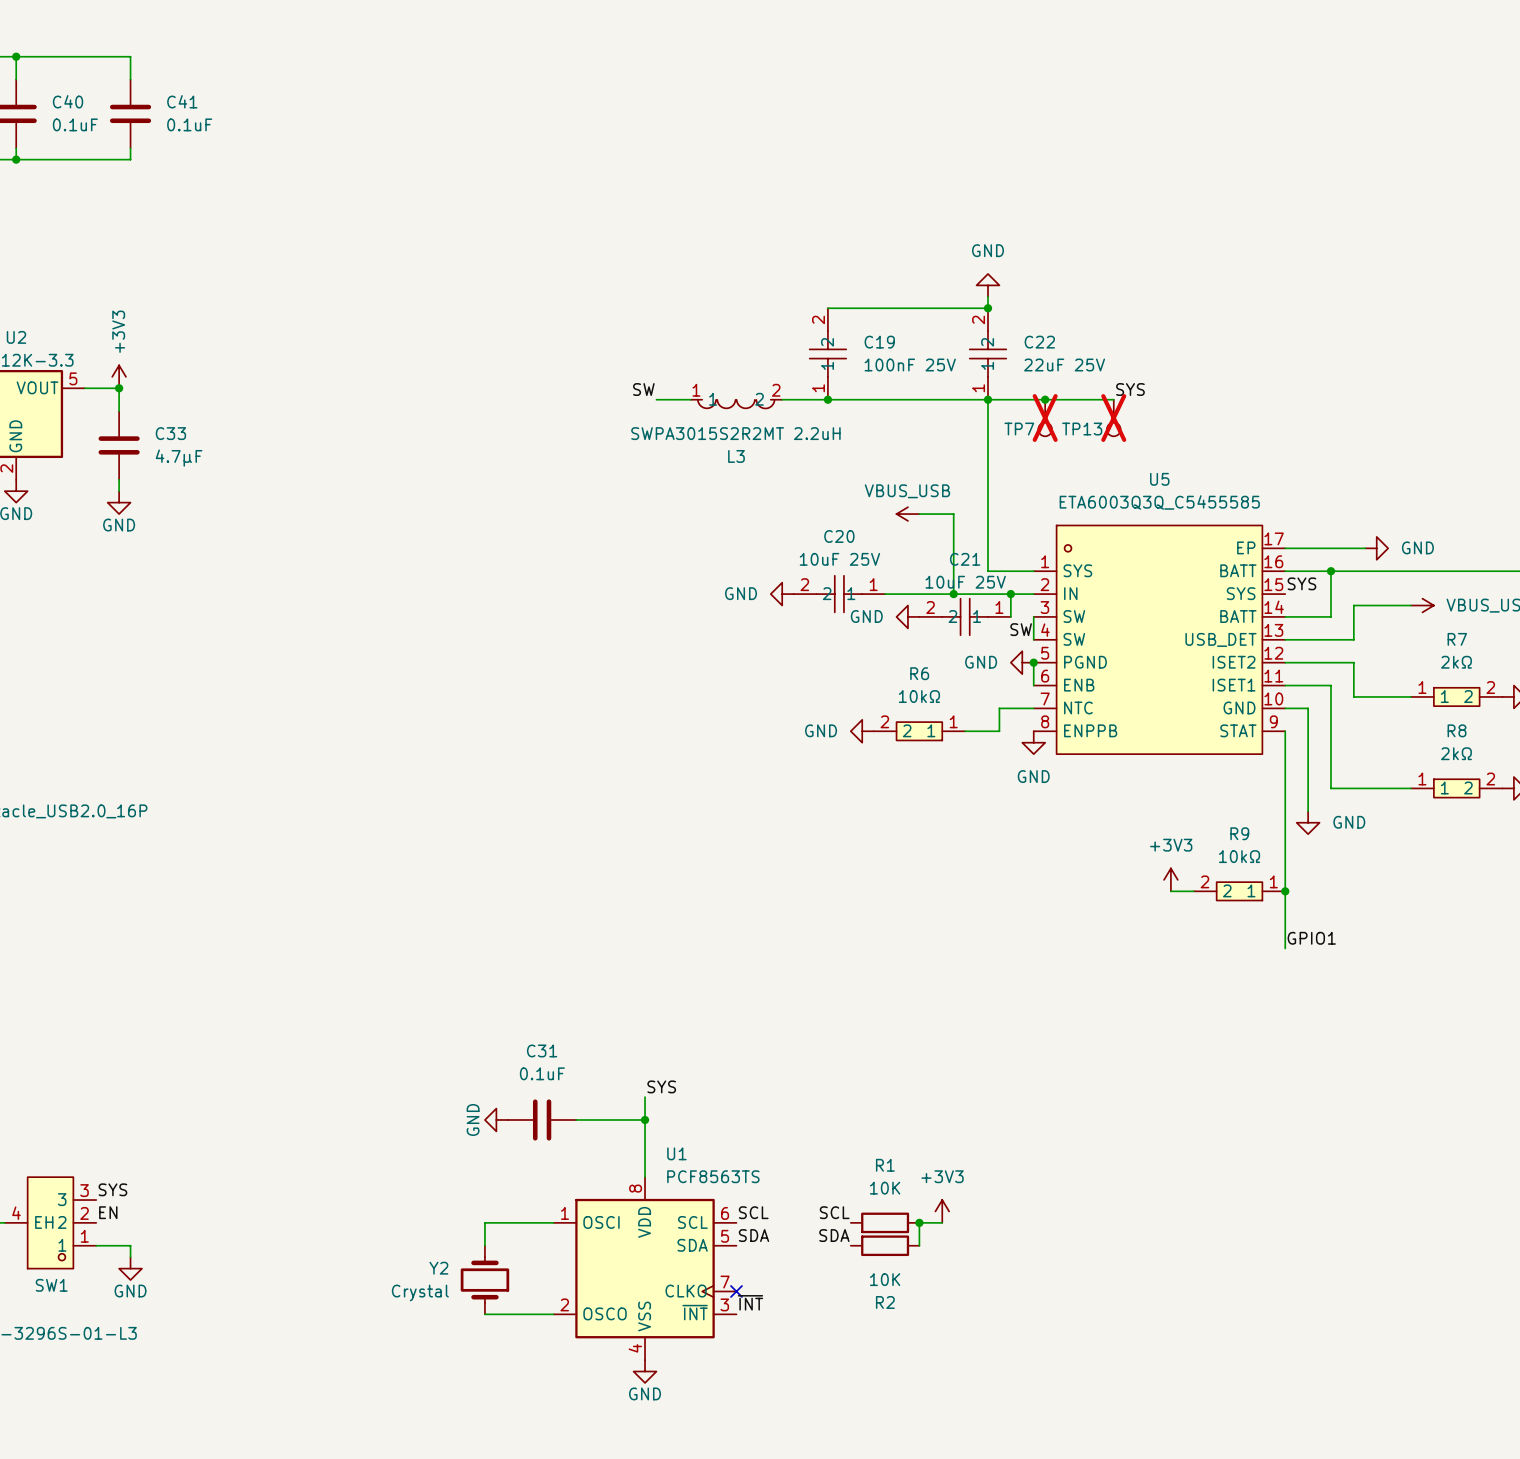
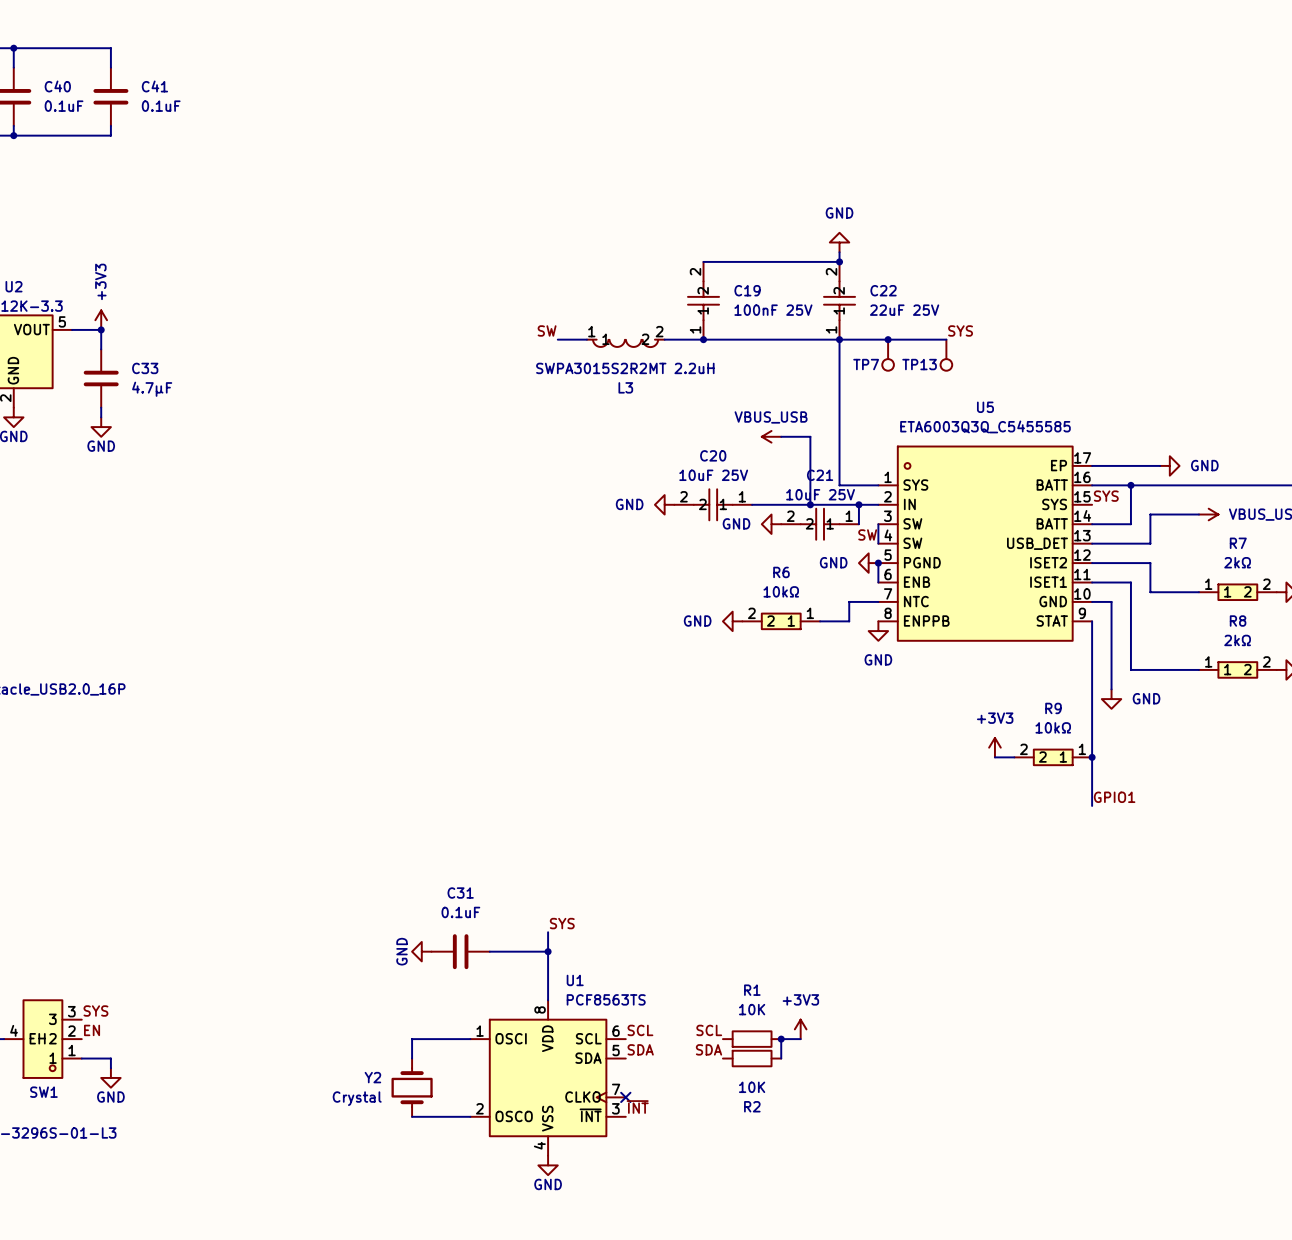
TP7 do-not-place cross: (1045, 418) -> none
TP13 do-not-place cross: (1113, 418) -> none

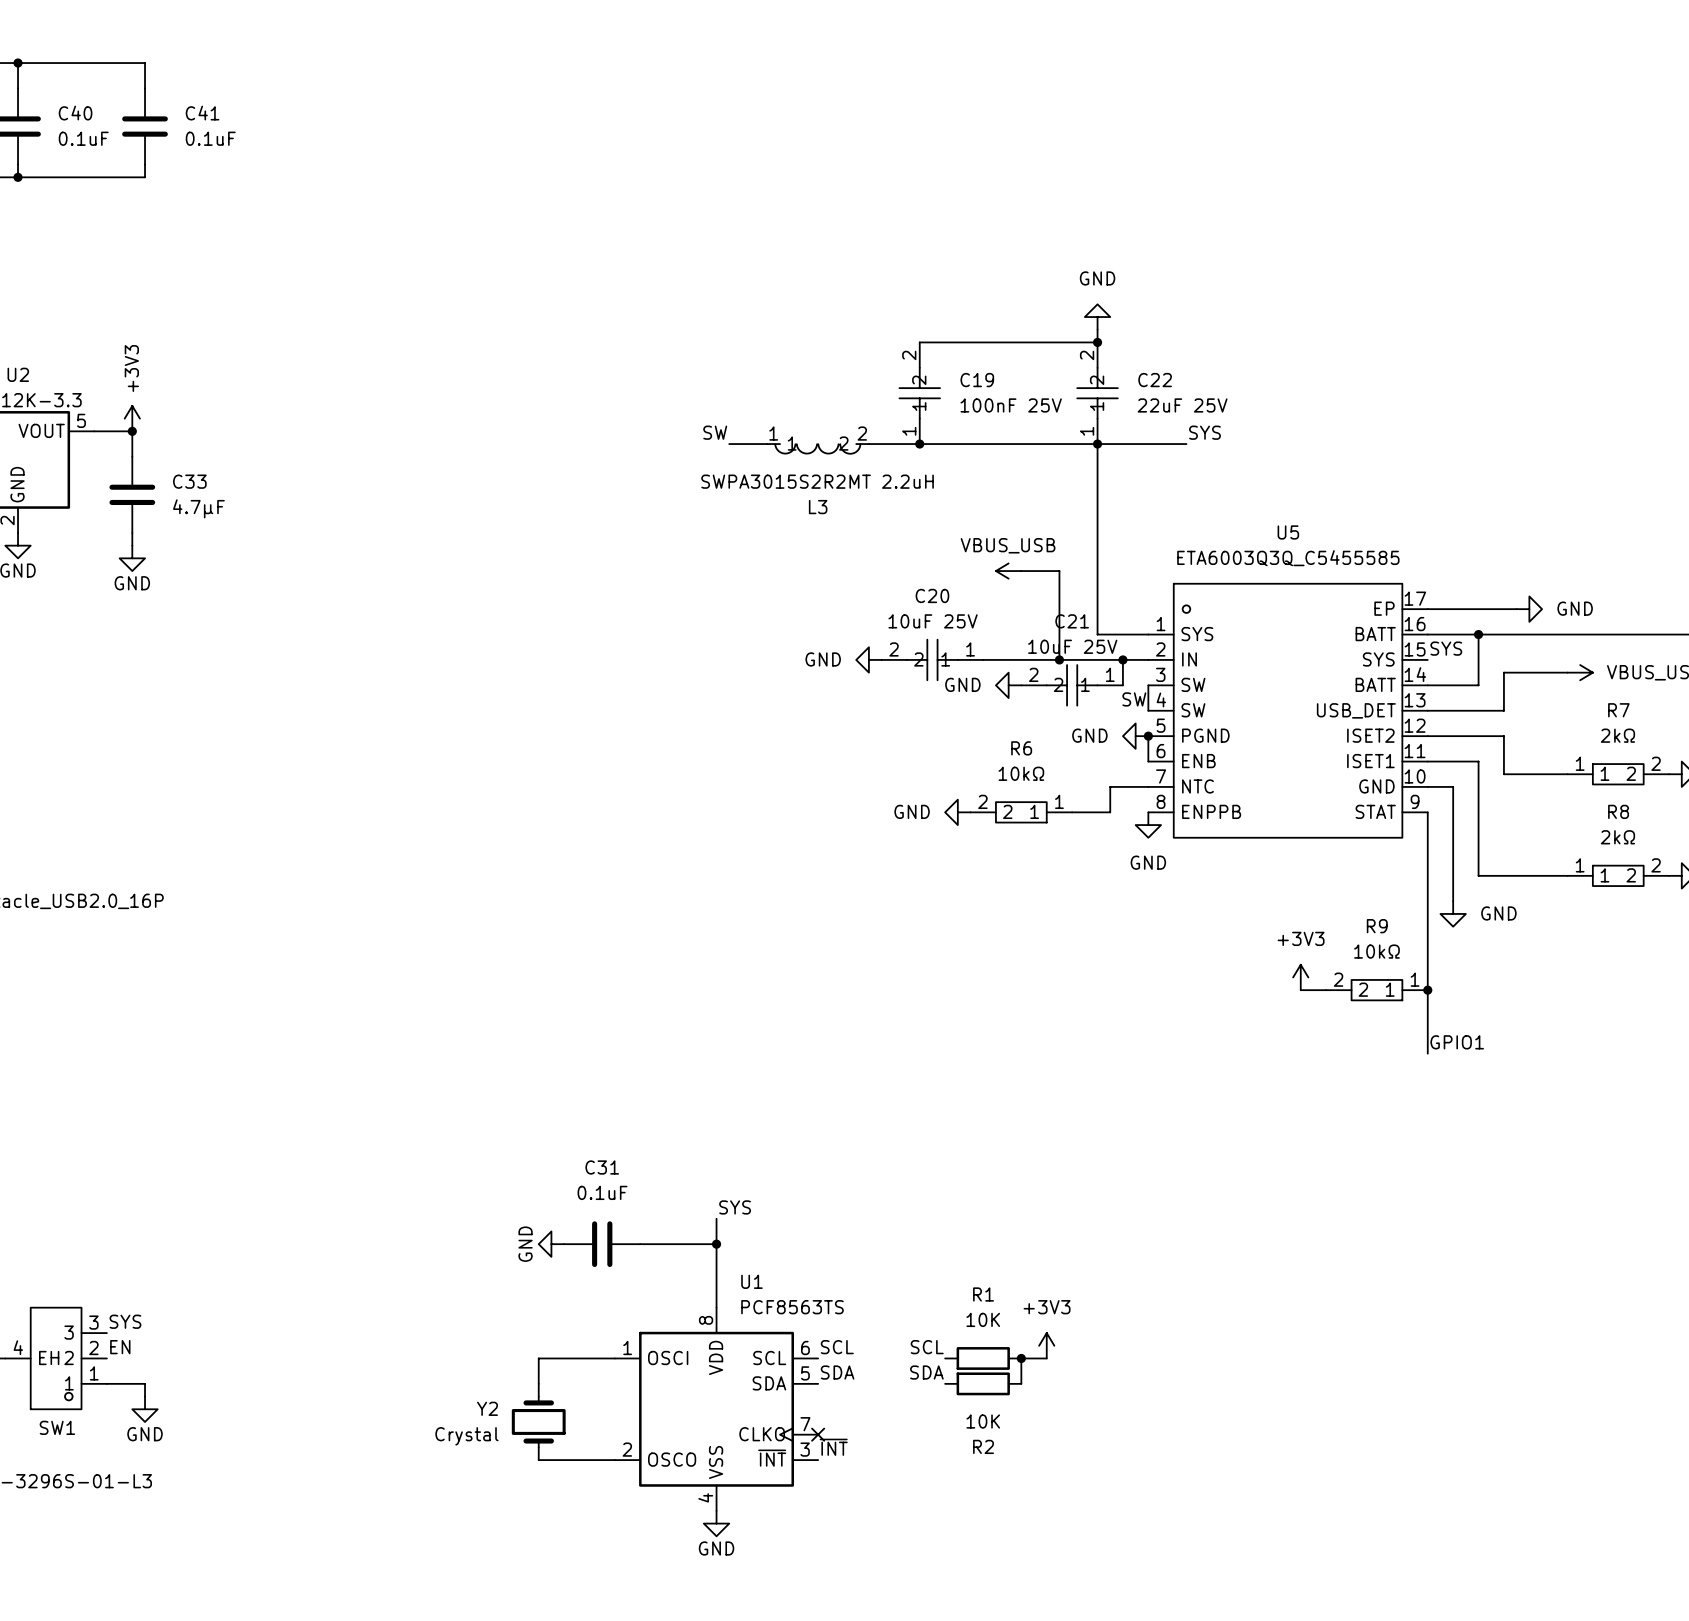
label position: SYS (960, 330) -> SYS (1204, 432)
junction: (888, 339) -> none
wire: (907, 339) (946, 339) -> none
TP7: (888, 355) -> none
TP13: (946, 355) -> none

